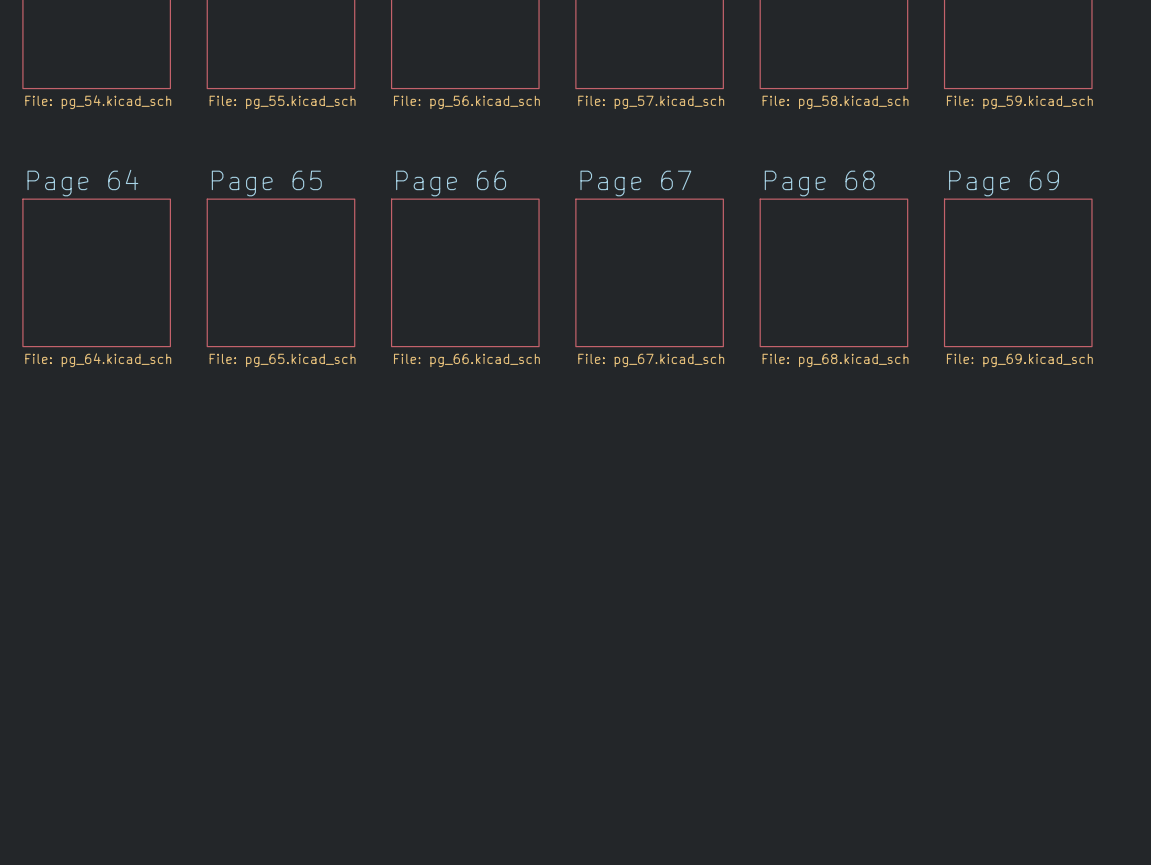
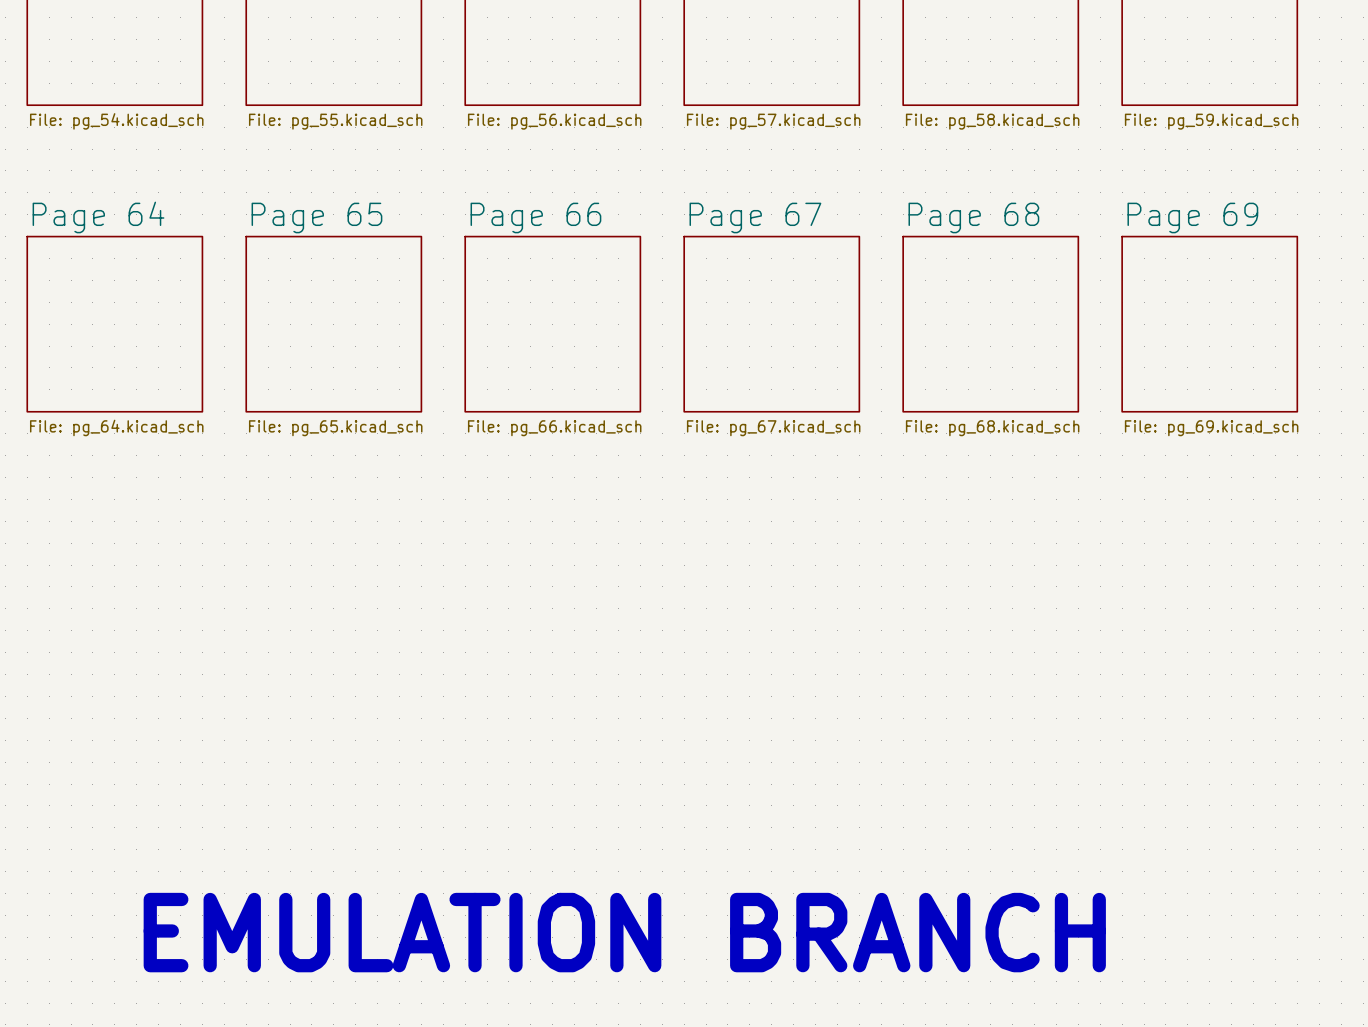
text: none -> EMULATION BRANCH (624, 932)

